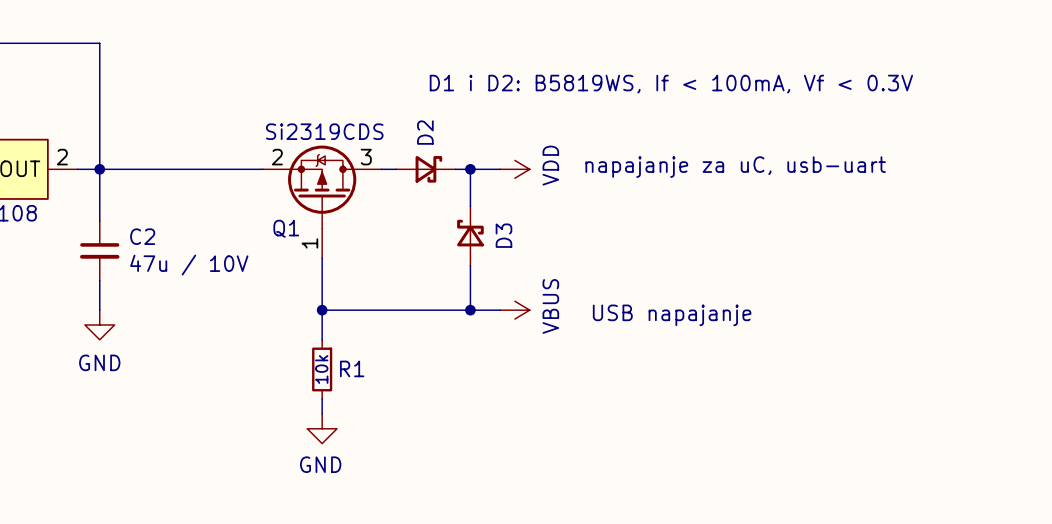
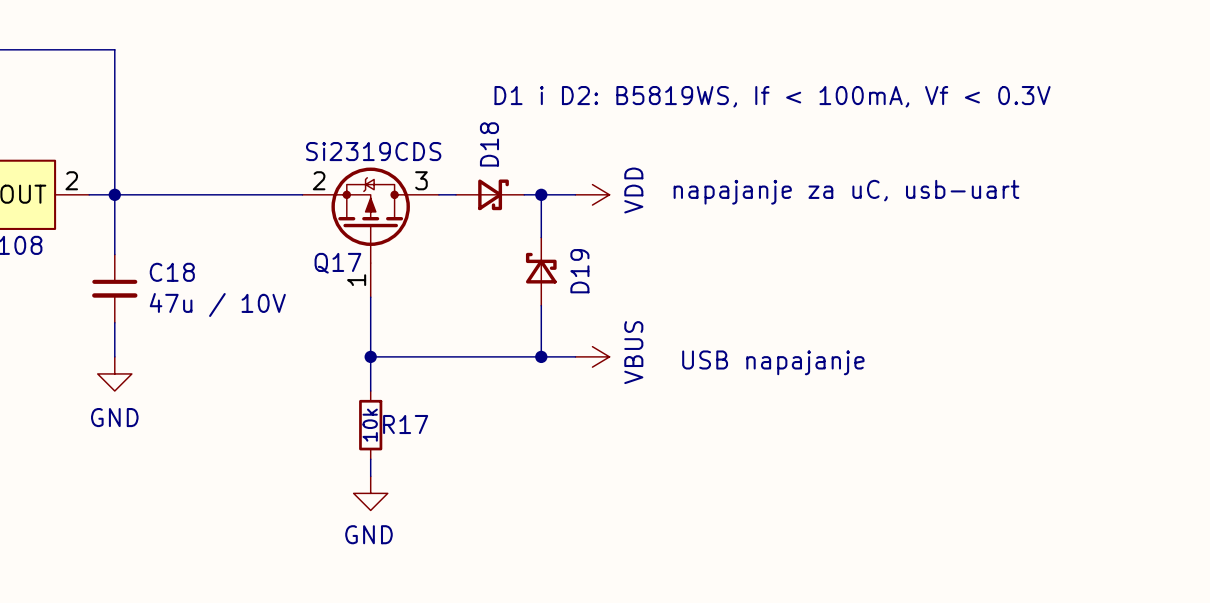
D2 name: D2 (425, 132) -> D18 (489, 144)
Q1 name: Q1 (286, 228) -> Q17 (337, 263)
D3 name: D3 (503, 235) -> D19 (579, 271)
C2 name: C2 (142, 236) -> C18 (172, 272)
R1 name: R1 (352, 368) -> R17 (405, 424)

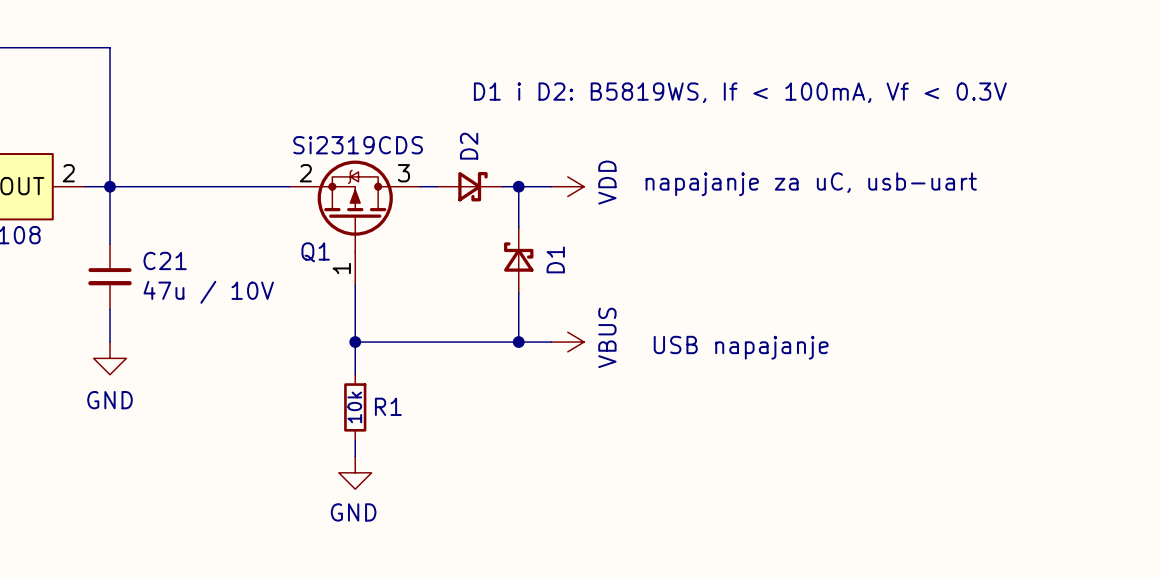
D18 name: D18 (489, 144) -> D2 (469, 146)
Q17 name: Q17 (337, 263) -> Q1 (315, 252)
D19 name: D19 (579, 271) -> D1 (555, 259)
C18 name: C18 (172, 272) -> C21 (165, 260)
R17 name: R17 (405, 424) -> R1 (388, 406)

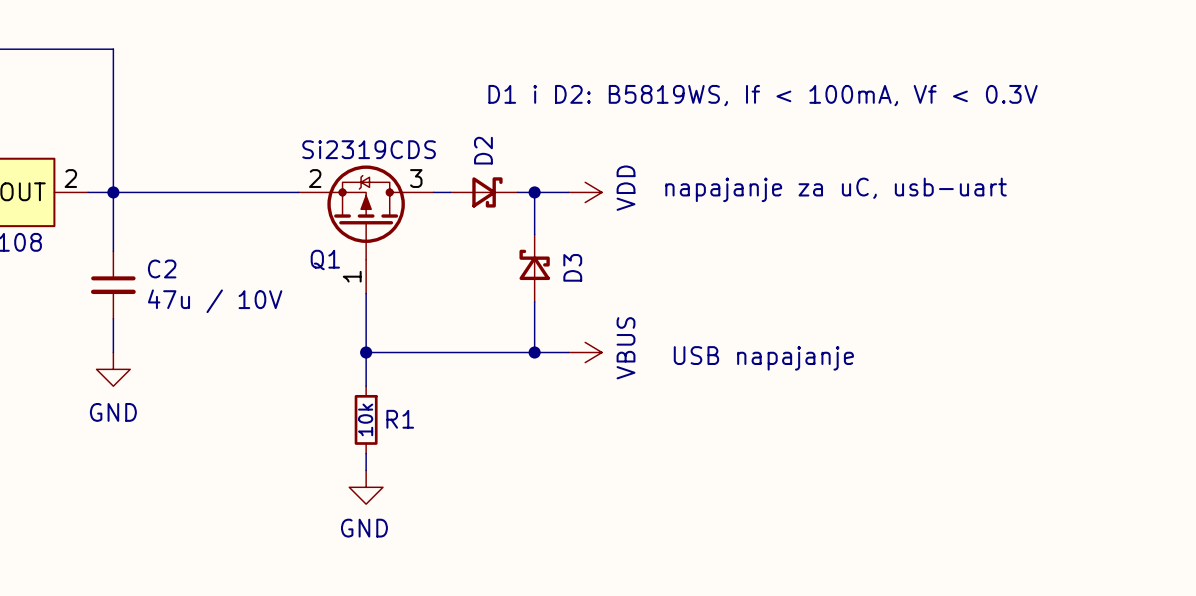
D1 name: D1 (555, 259) -> D3 (572, 267)
C21 name: C21 (165, 260) -> C2 (162, 268)

